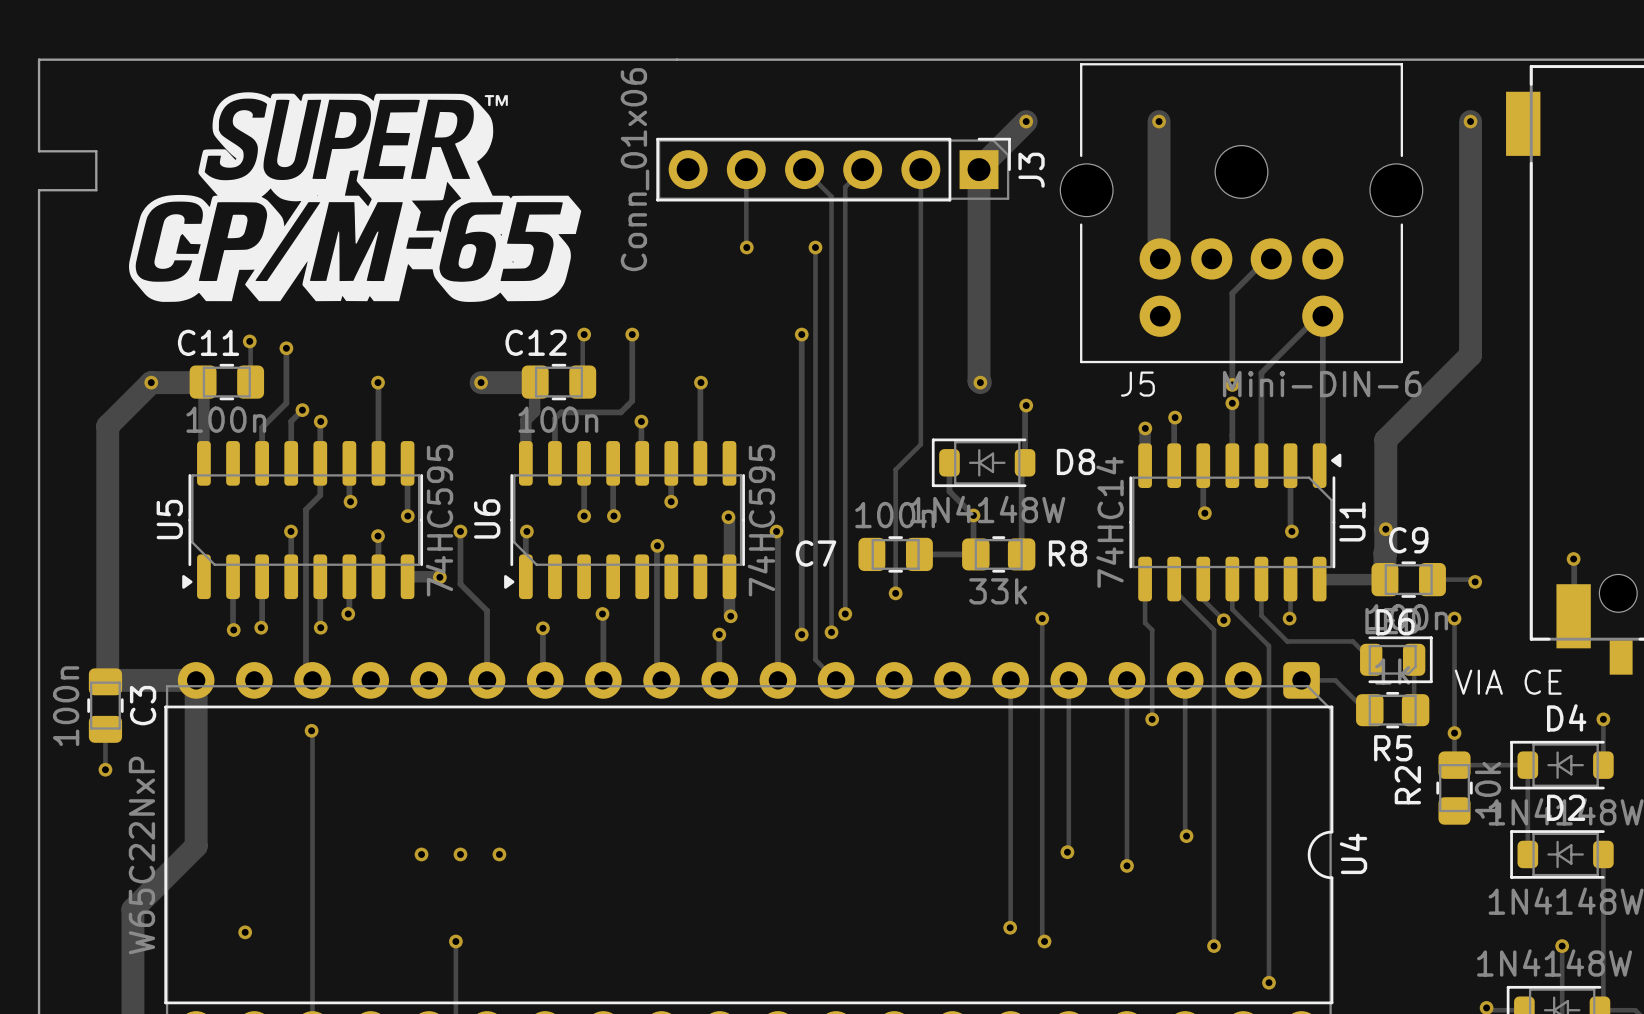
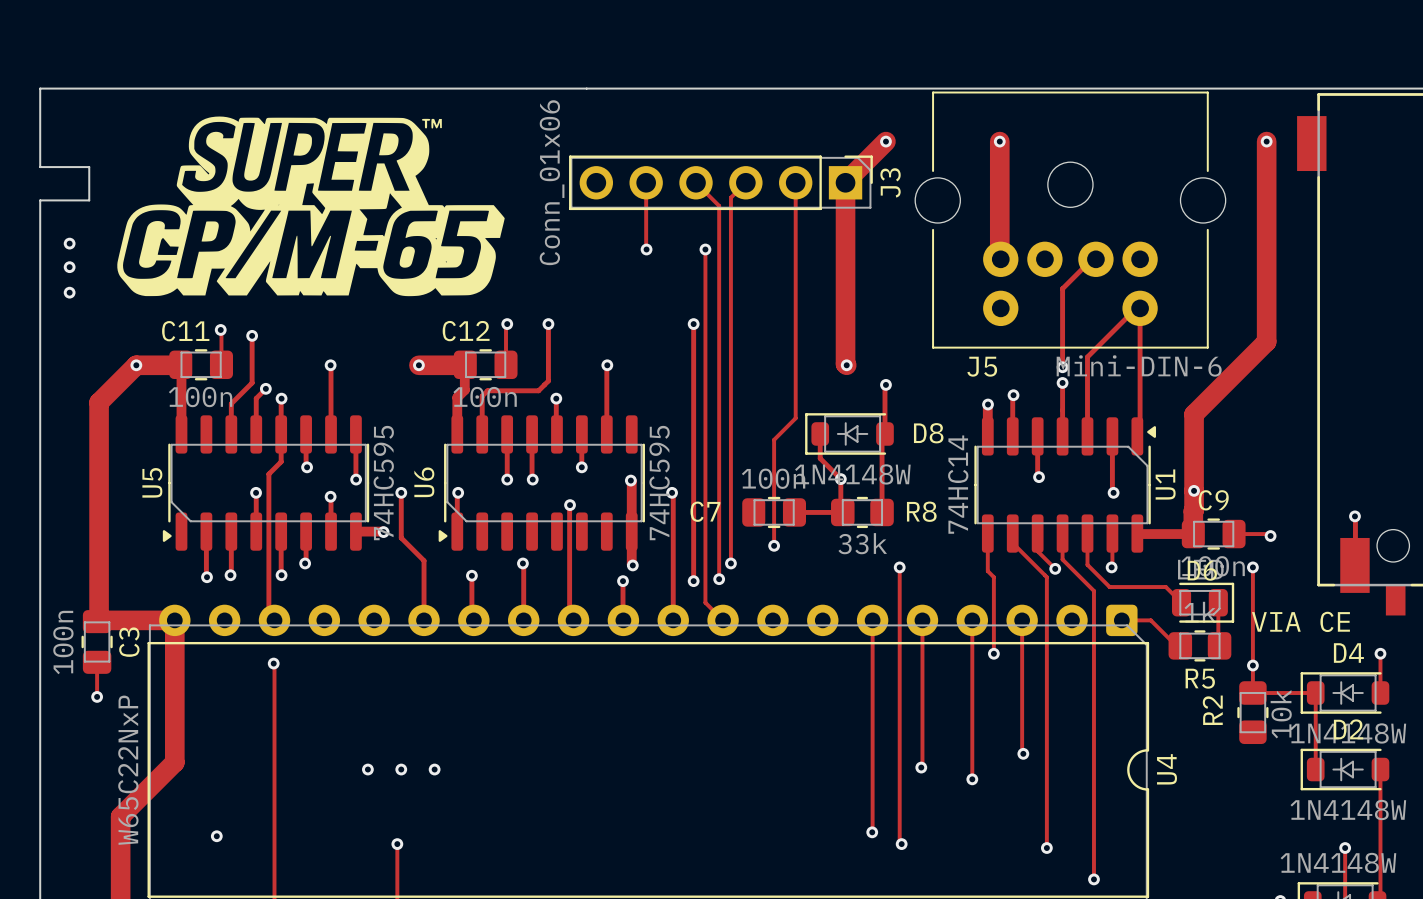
via: none -> (69, 243)
via: none -> (69, 267)
via: none -> (69, 292)

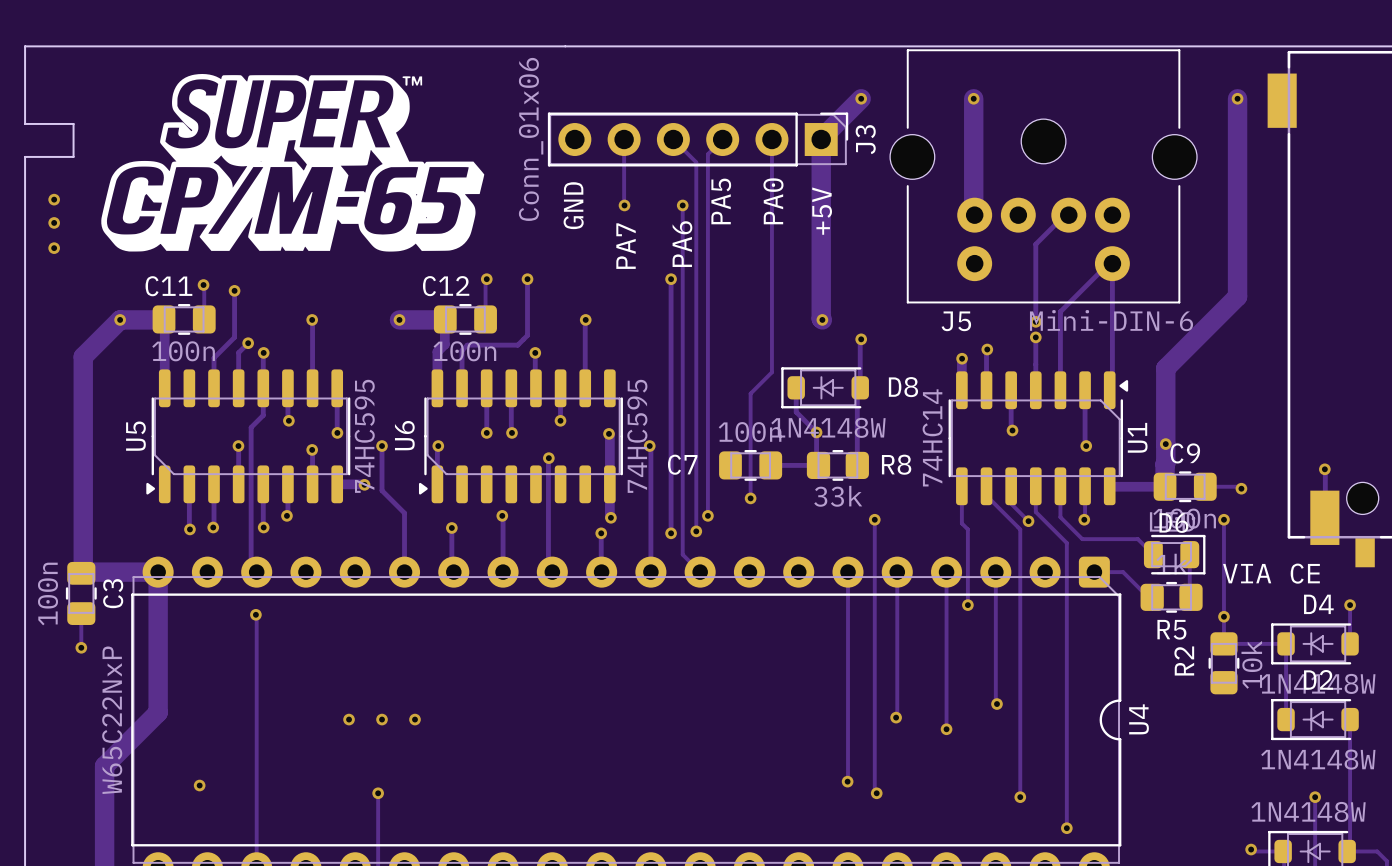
text: none -> PA5 (721, 201)
text: none -> PA0 (773, 201)
text: none -> GND (573, 205)
text: none -> +5V (822, 211)
text: none -> PA6 (682, 244)
text: none -> PA7 (626, 246)

